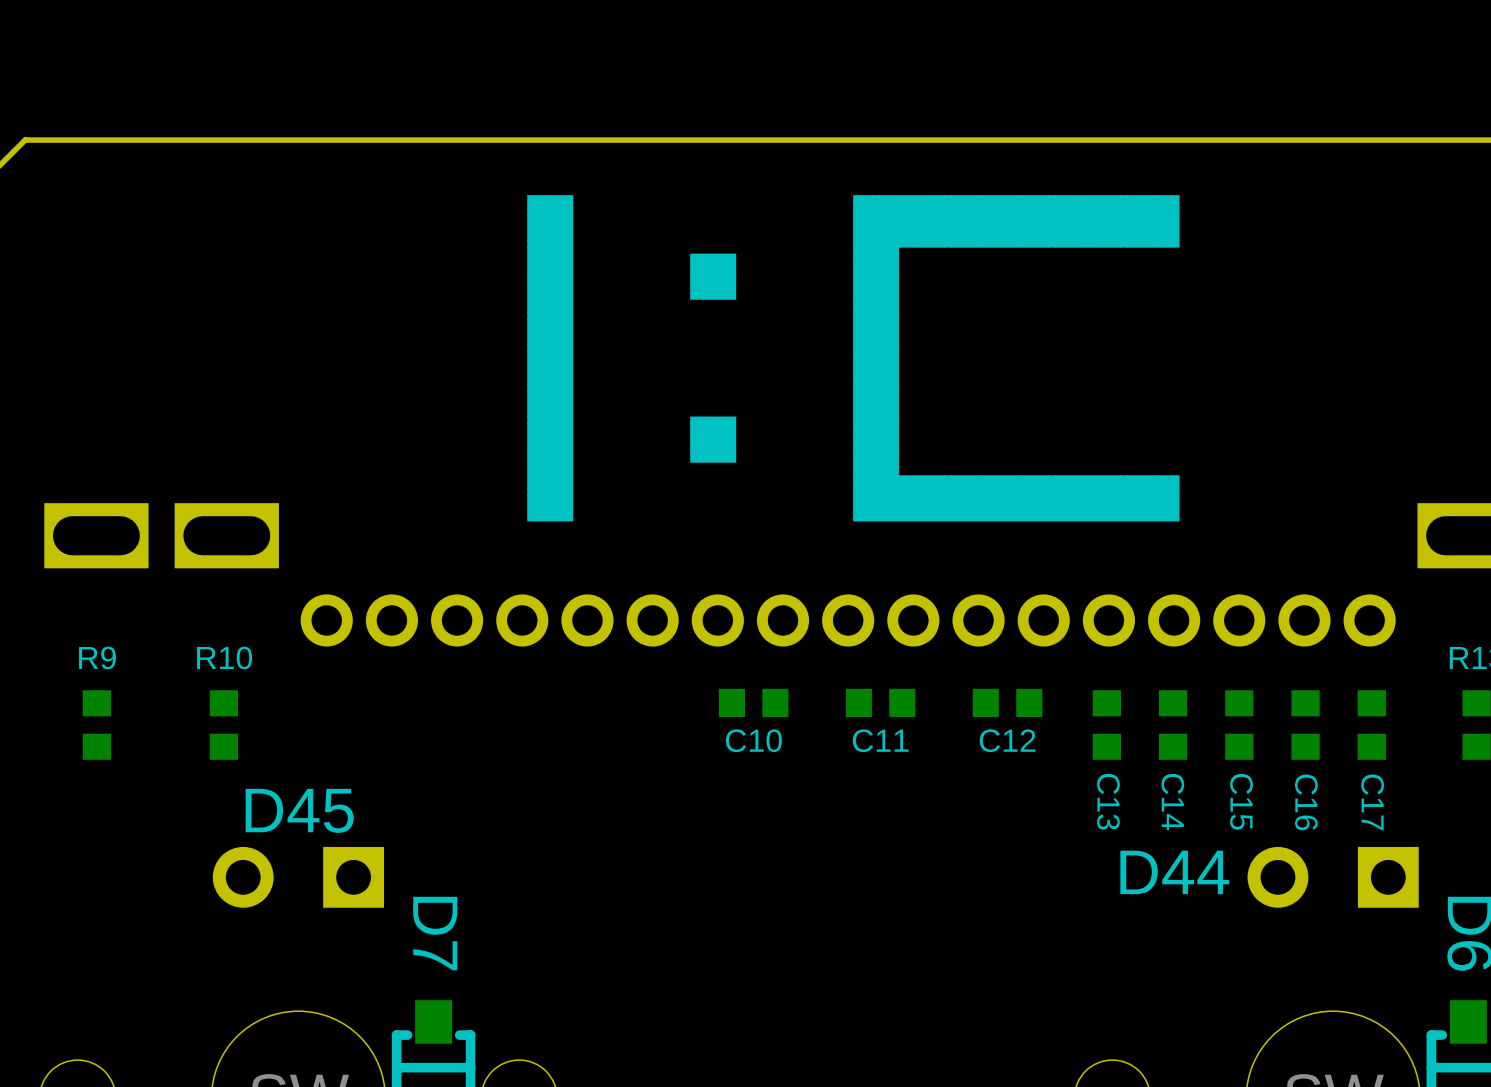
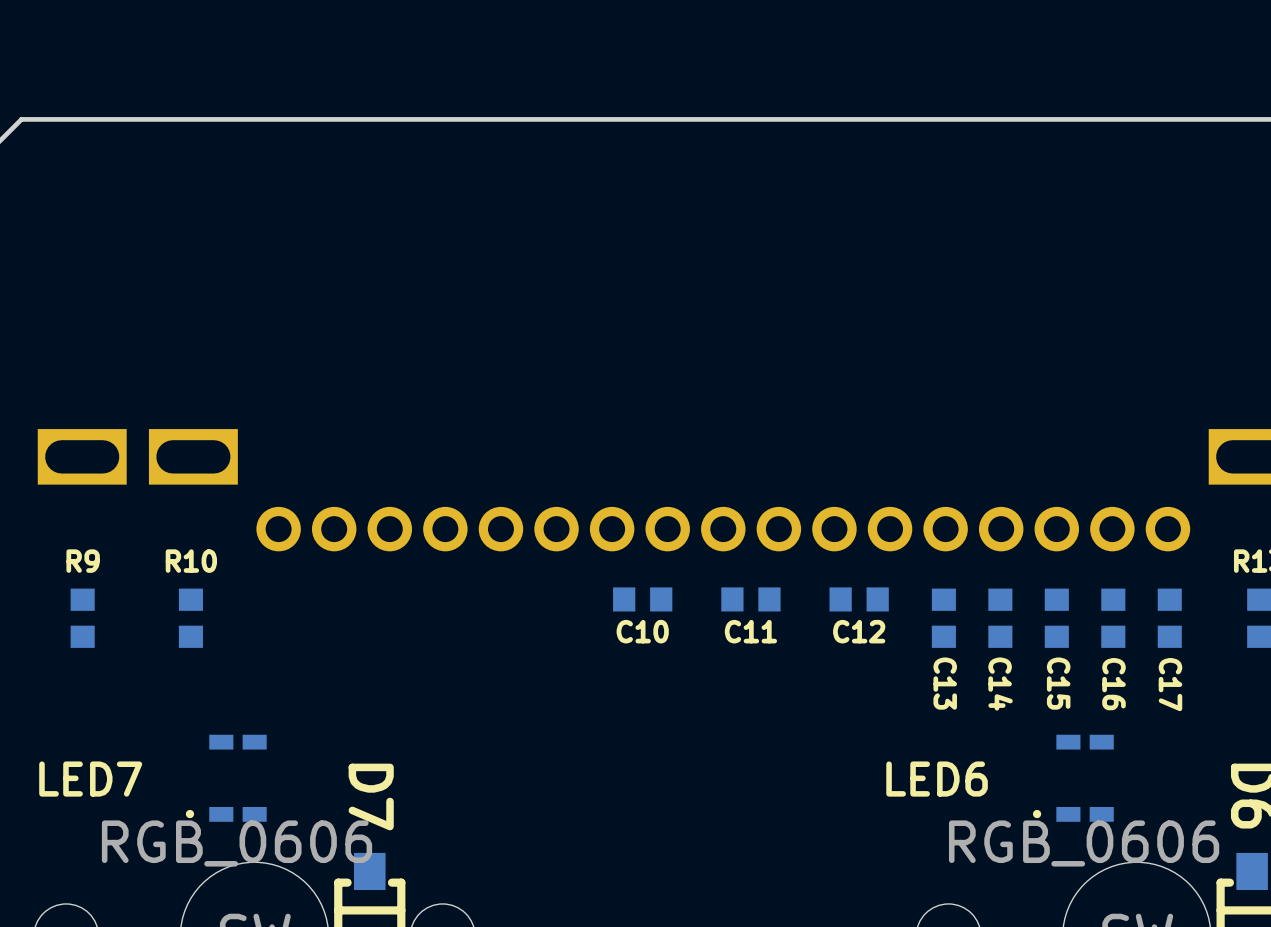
drawing: [527, 195, 1180, 522] -> none
D45: (298, 877) -> none
D44: (1333, 877) -> none
LED7: none -> RGB_0606 (237, 778)
LED6: none -> RGB_0606 (1085, 778)

